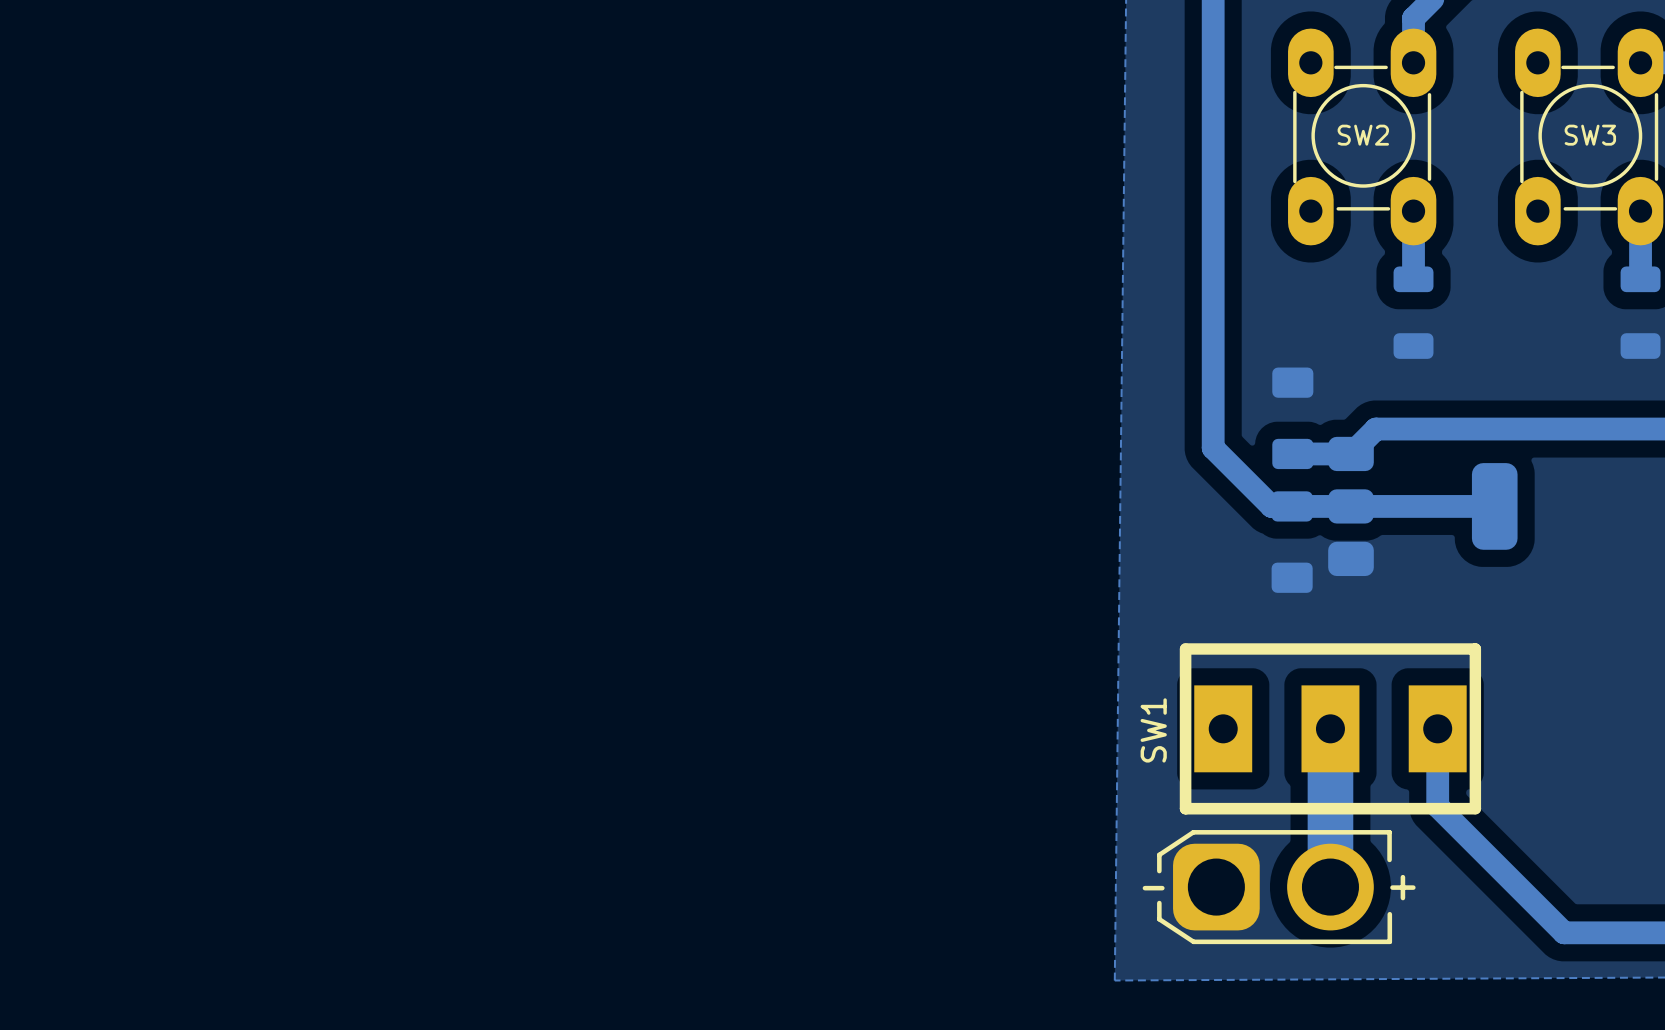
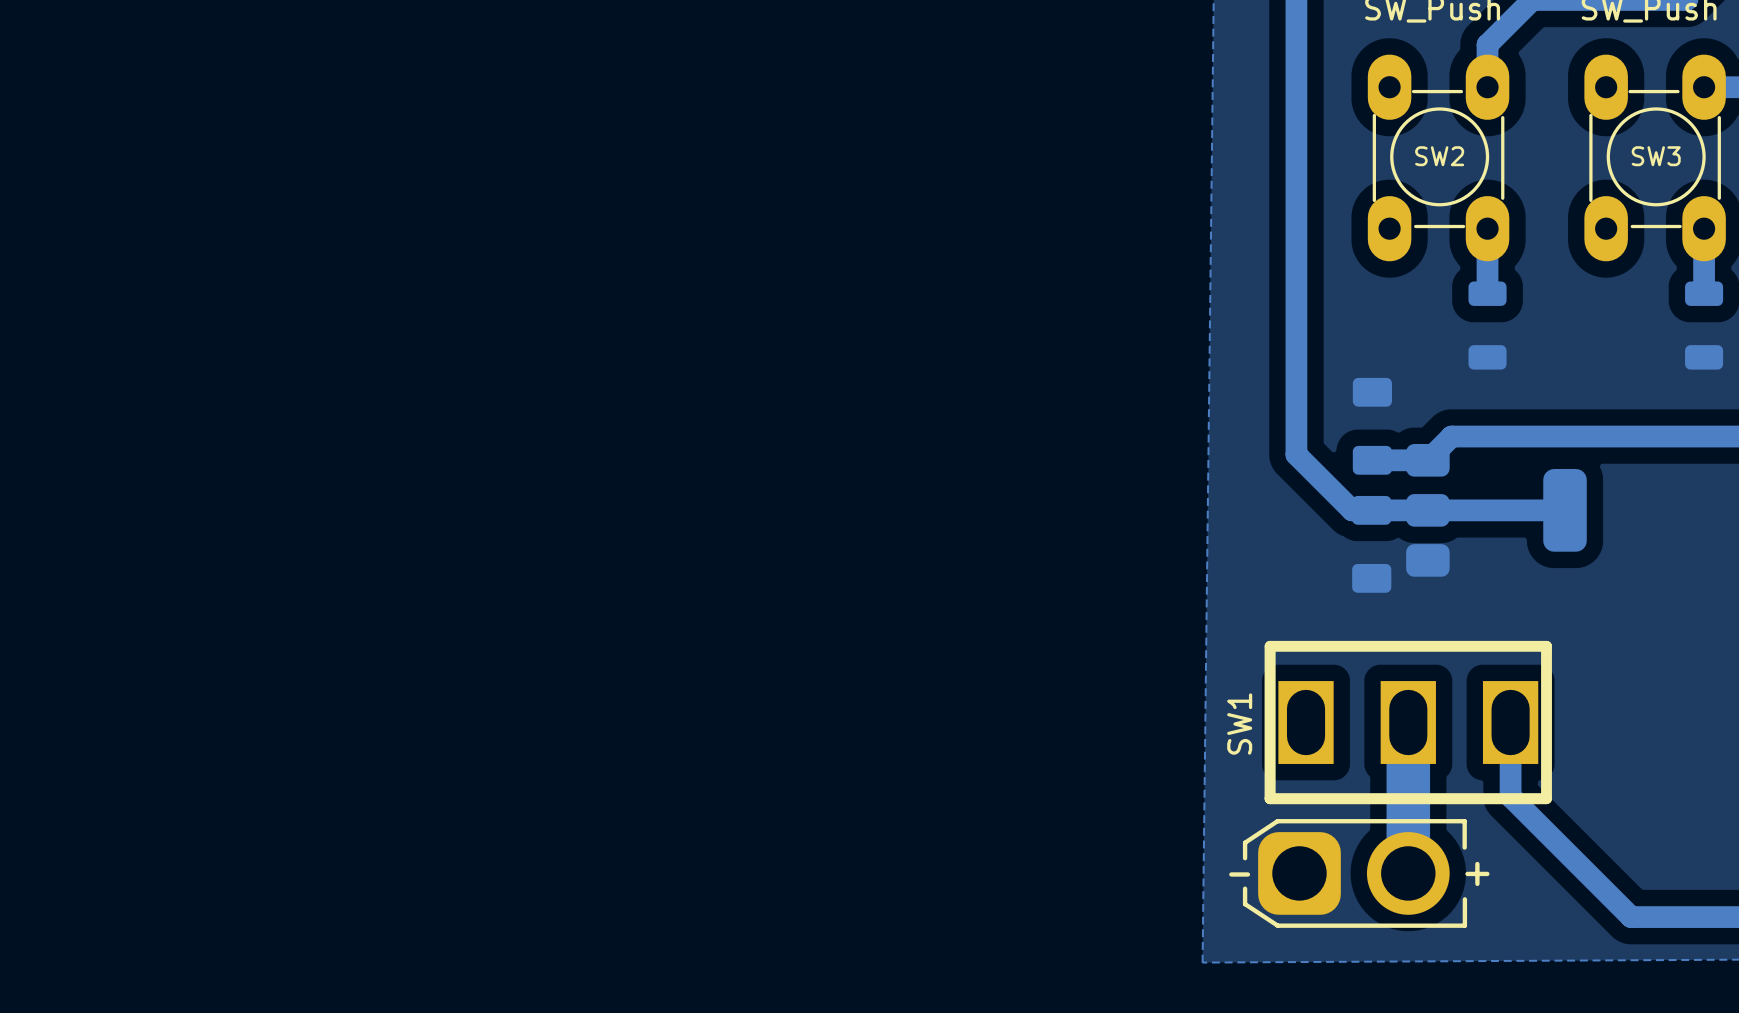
SW1 footprint: [1179, 643, 1482, 815] -> [1264, 640, 1553, 805]

